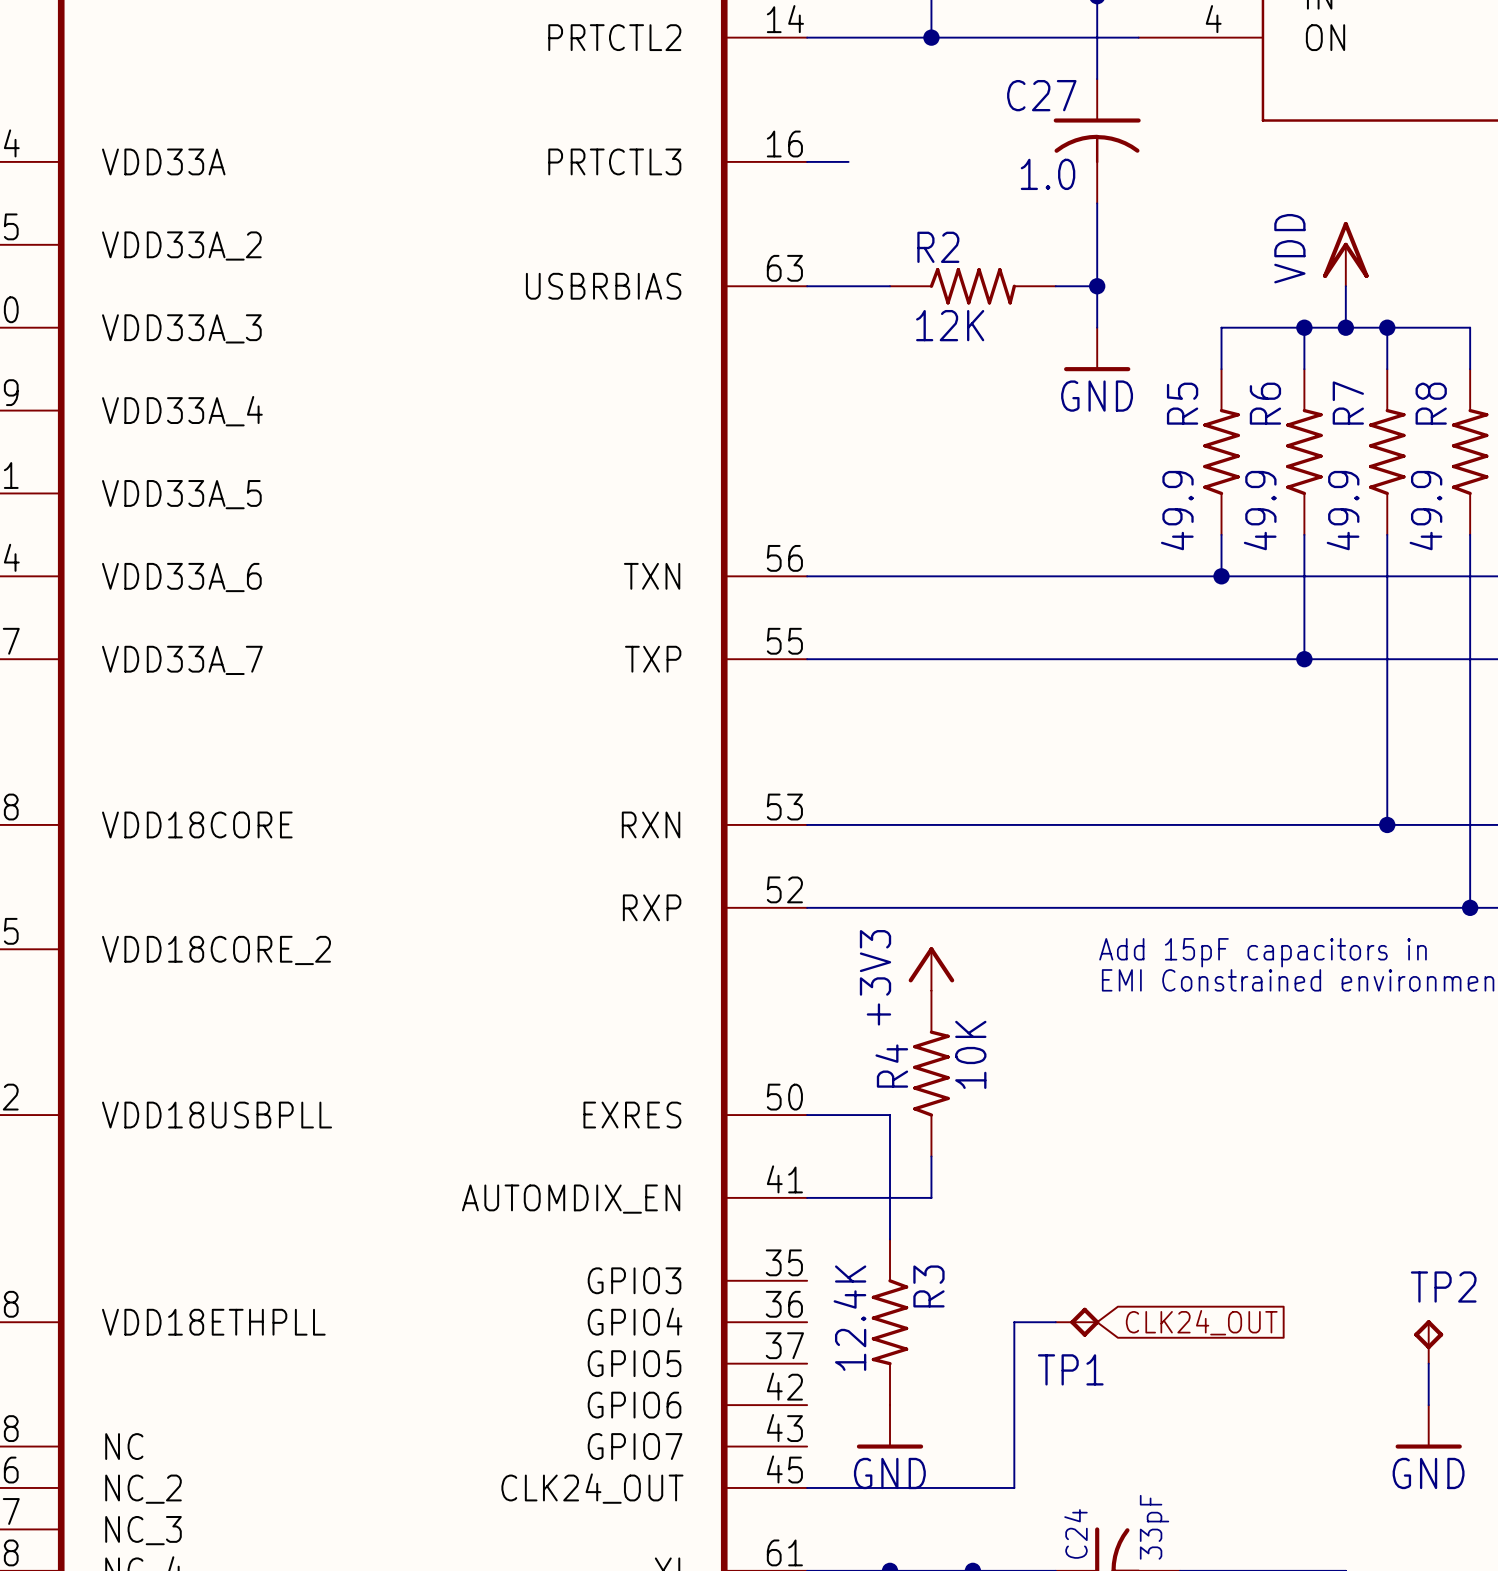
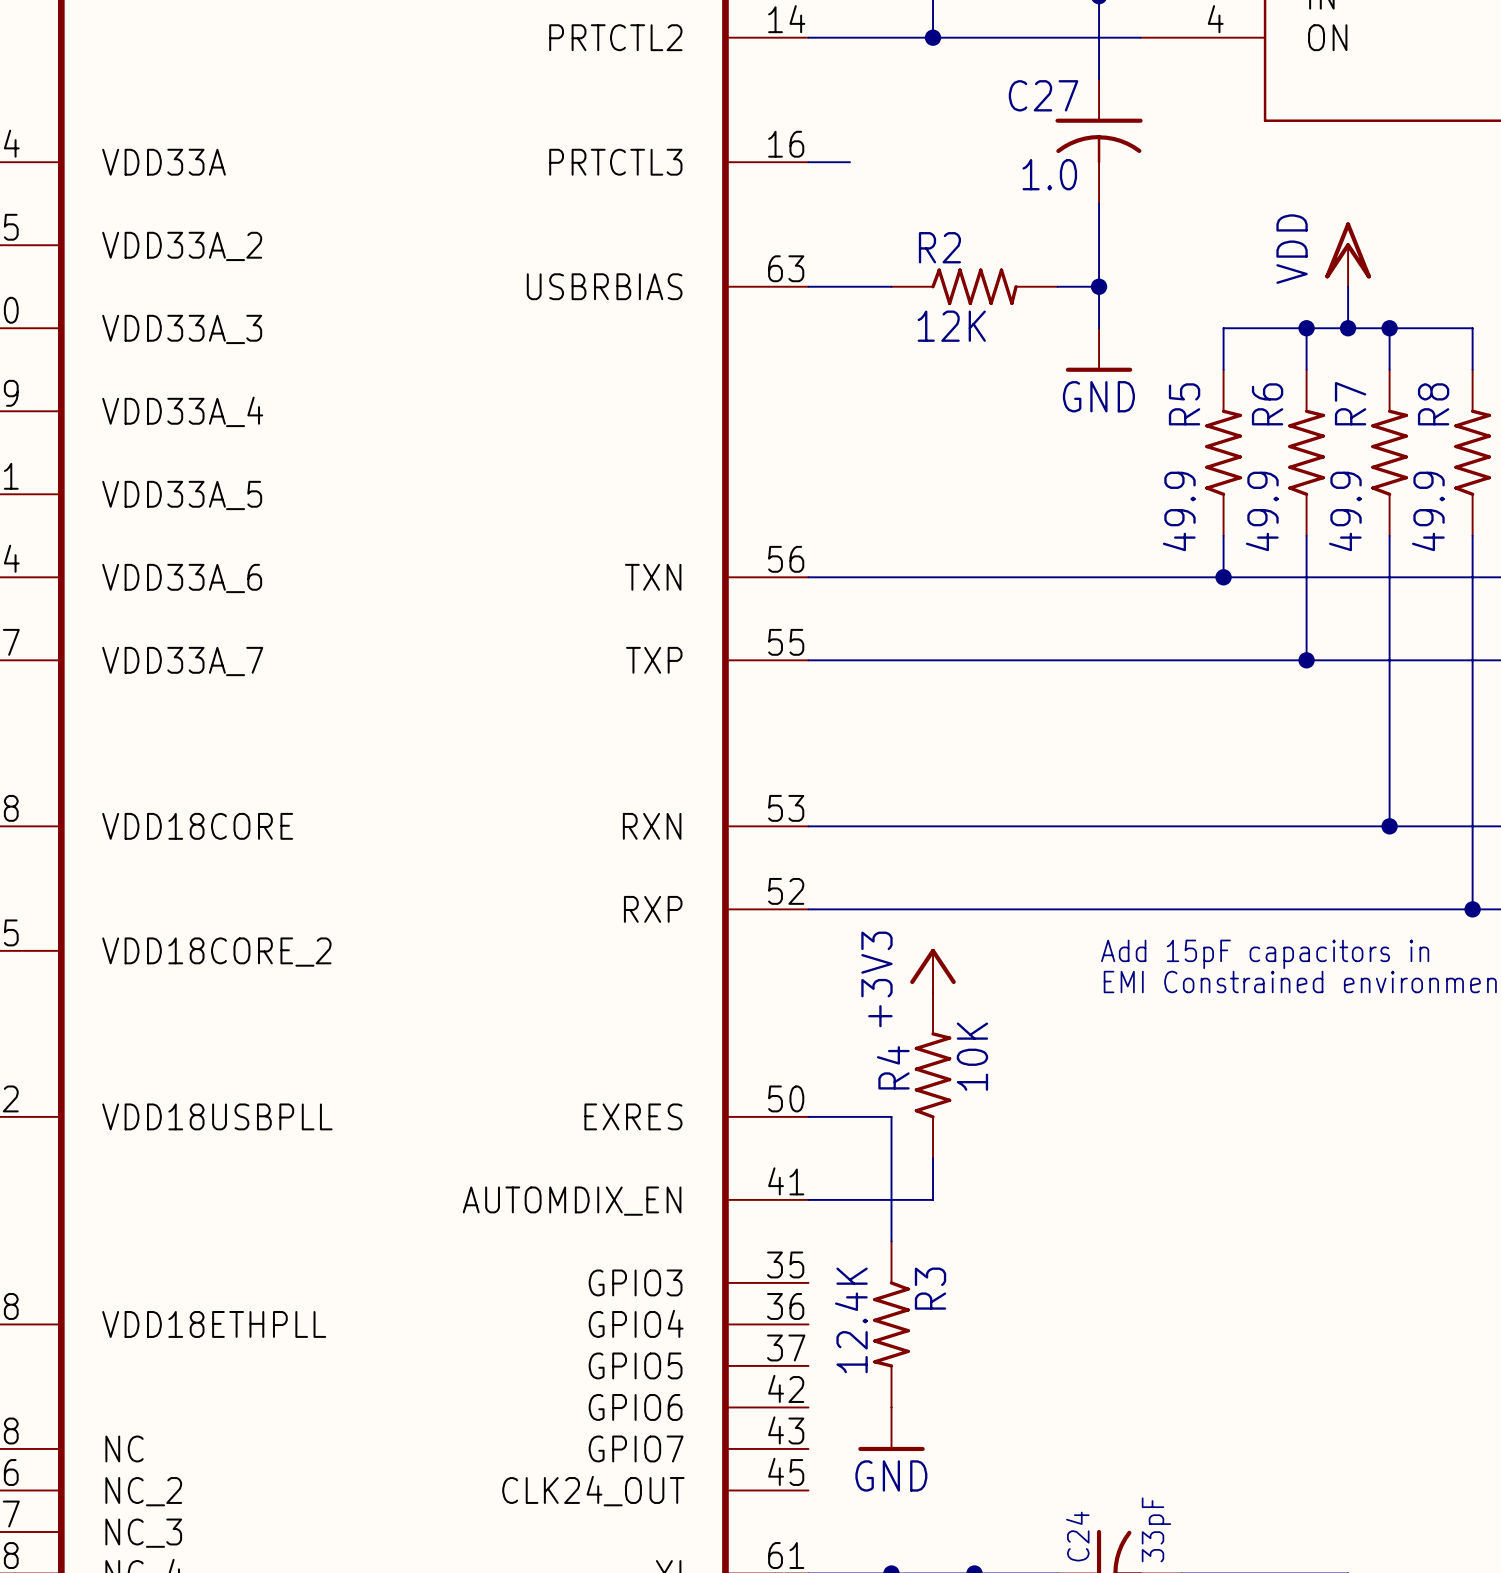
wire: (1055, 1322) (1014, 1322) (1014, 1487) (807, 1487) -> none
TP1: (1077, 1322) -> none
global label: CLK24_OUT (1201, 1322) -> none
TP2: (1428, 1341) -> none
wire: (1428, 1363) (1428, 1405) -> none
power symbol: GND (1428, 1426) -> none

